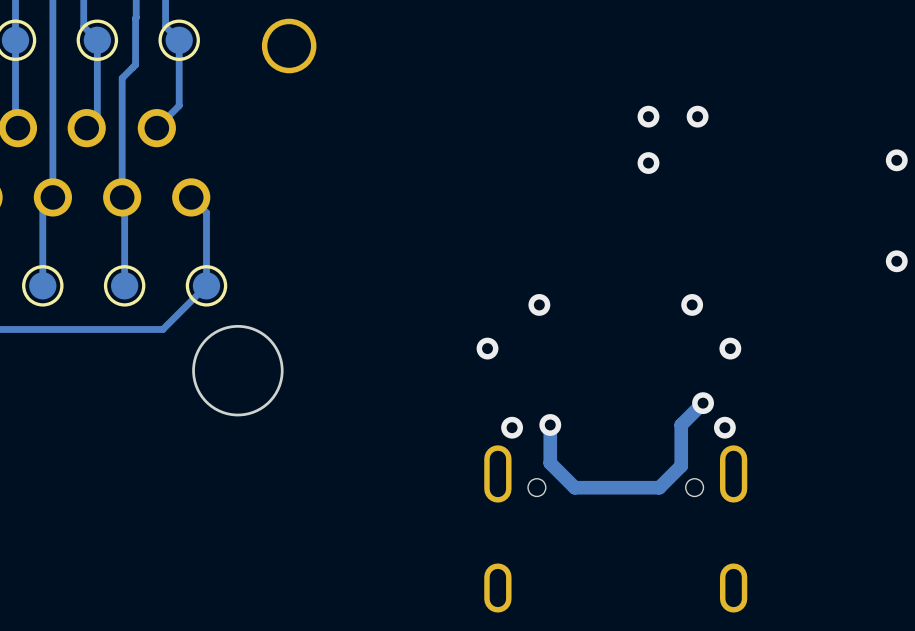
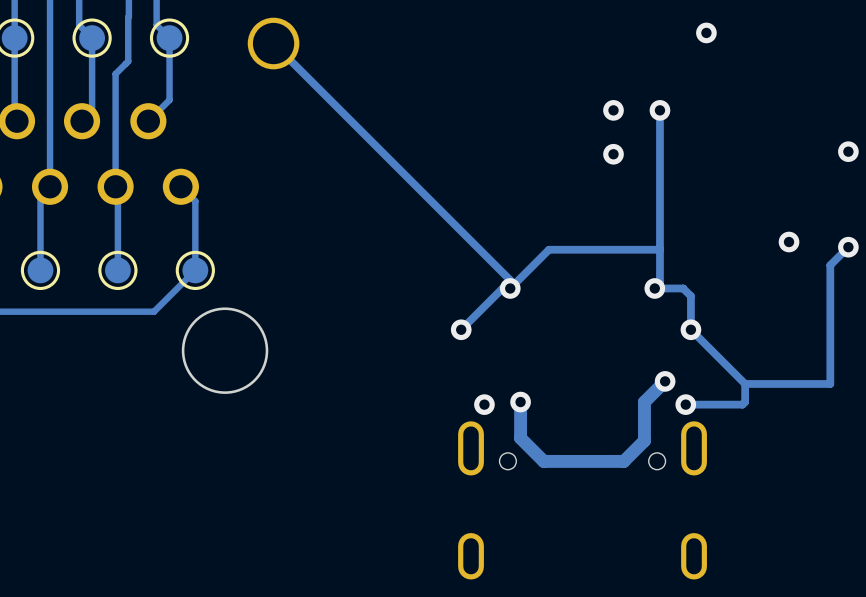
via: none -> (706, 32)
track: none -> (273, 43) (510, 280) (510, 288)
track: none -> (659, 110) (659, 283) (654, 288) (683, 288) (690, 296) (690, 329) (745, 383)
via: none -> (789, 242)
track: none -> (848, 247) (830, 265) (830, 383) (745, 383)
track: none -> (659, 249) (548, 249) (510, 288)
track: none -> (510, 288) (502, 288) (461, 329)
track: none -> (745, 383) (745, 402) (742, 404) (685, 404)

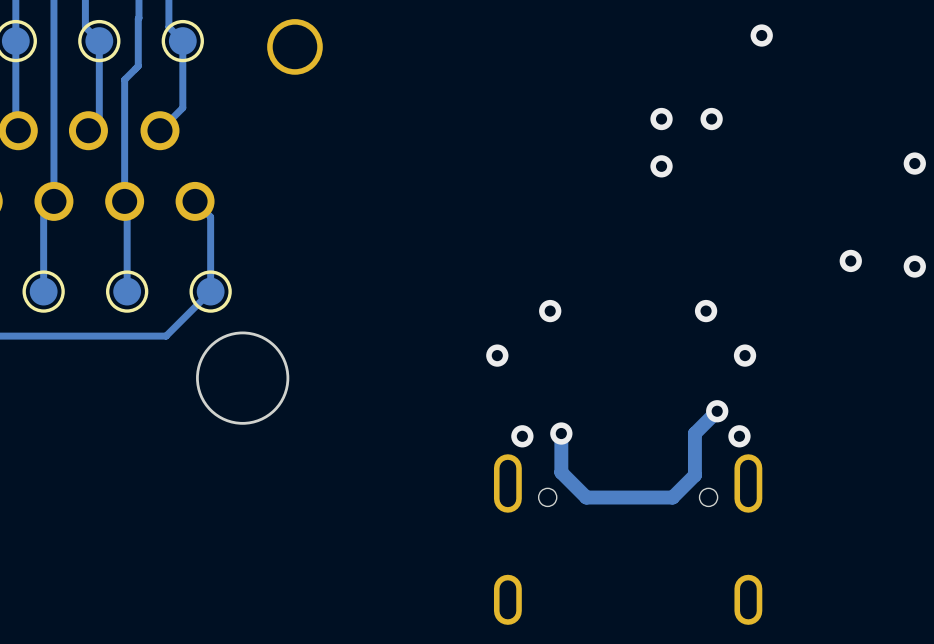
track: (273, 43) (510, 280) (510, 288) -> none
track: (659, 110) (659, 283) (654, 288) (683, 288) (690, 296) (690, 329) (745, 383) -> none
track: (848, 247) (830, 265) (830, 383) (745, 383) -> none
track: (659, 249) (548, 249) (510, 288) -> none
track: (510, 288) (502, 288) (461, 329) -> none
track: (745, 383) (745, 402) (742, 404) (685, 404) -> none

